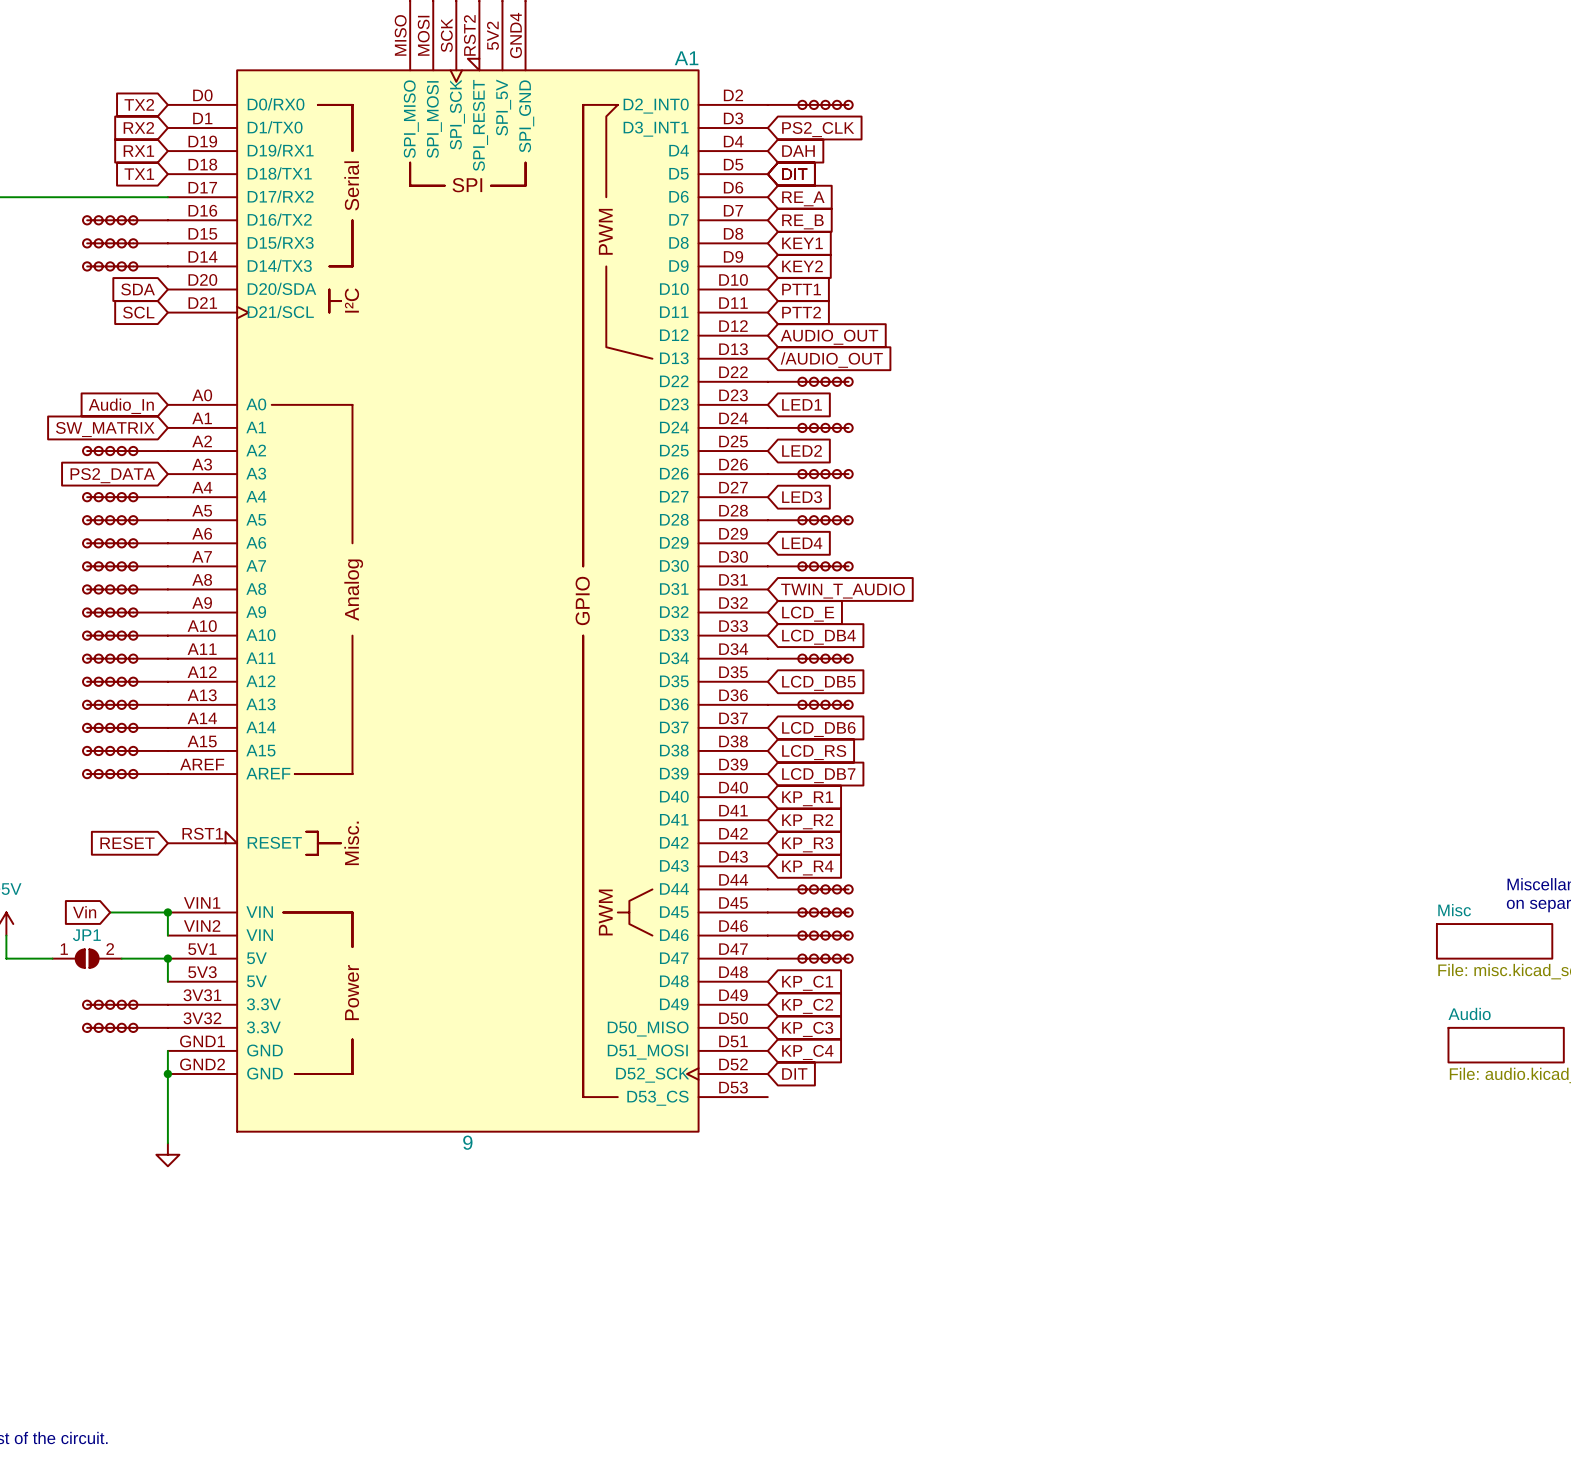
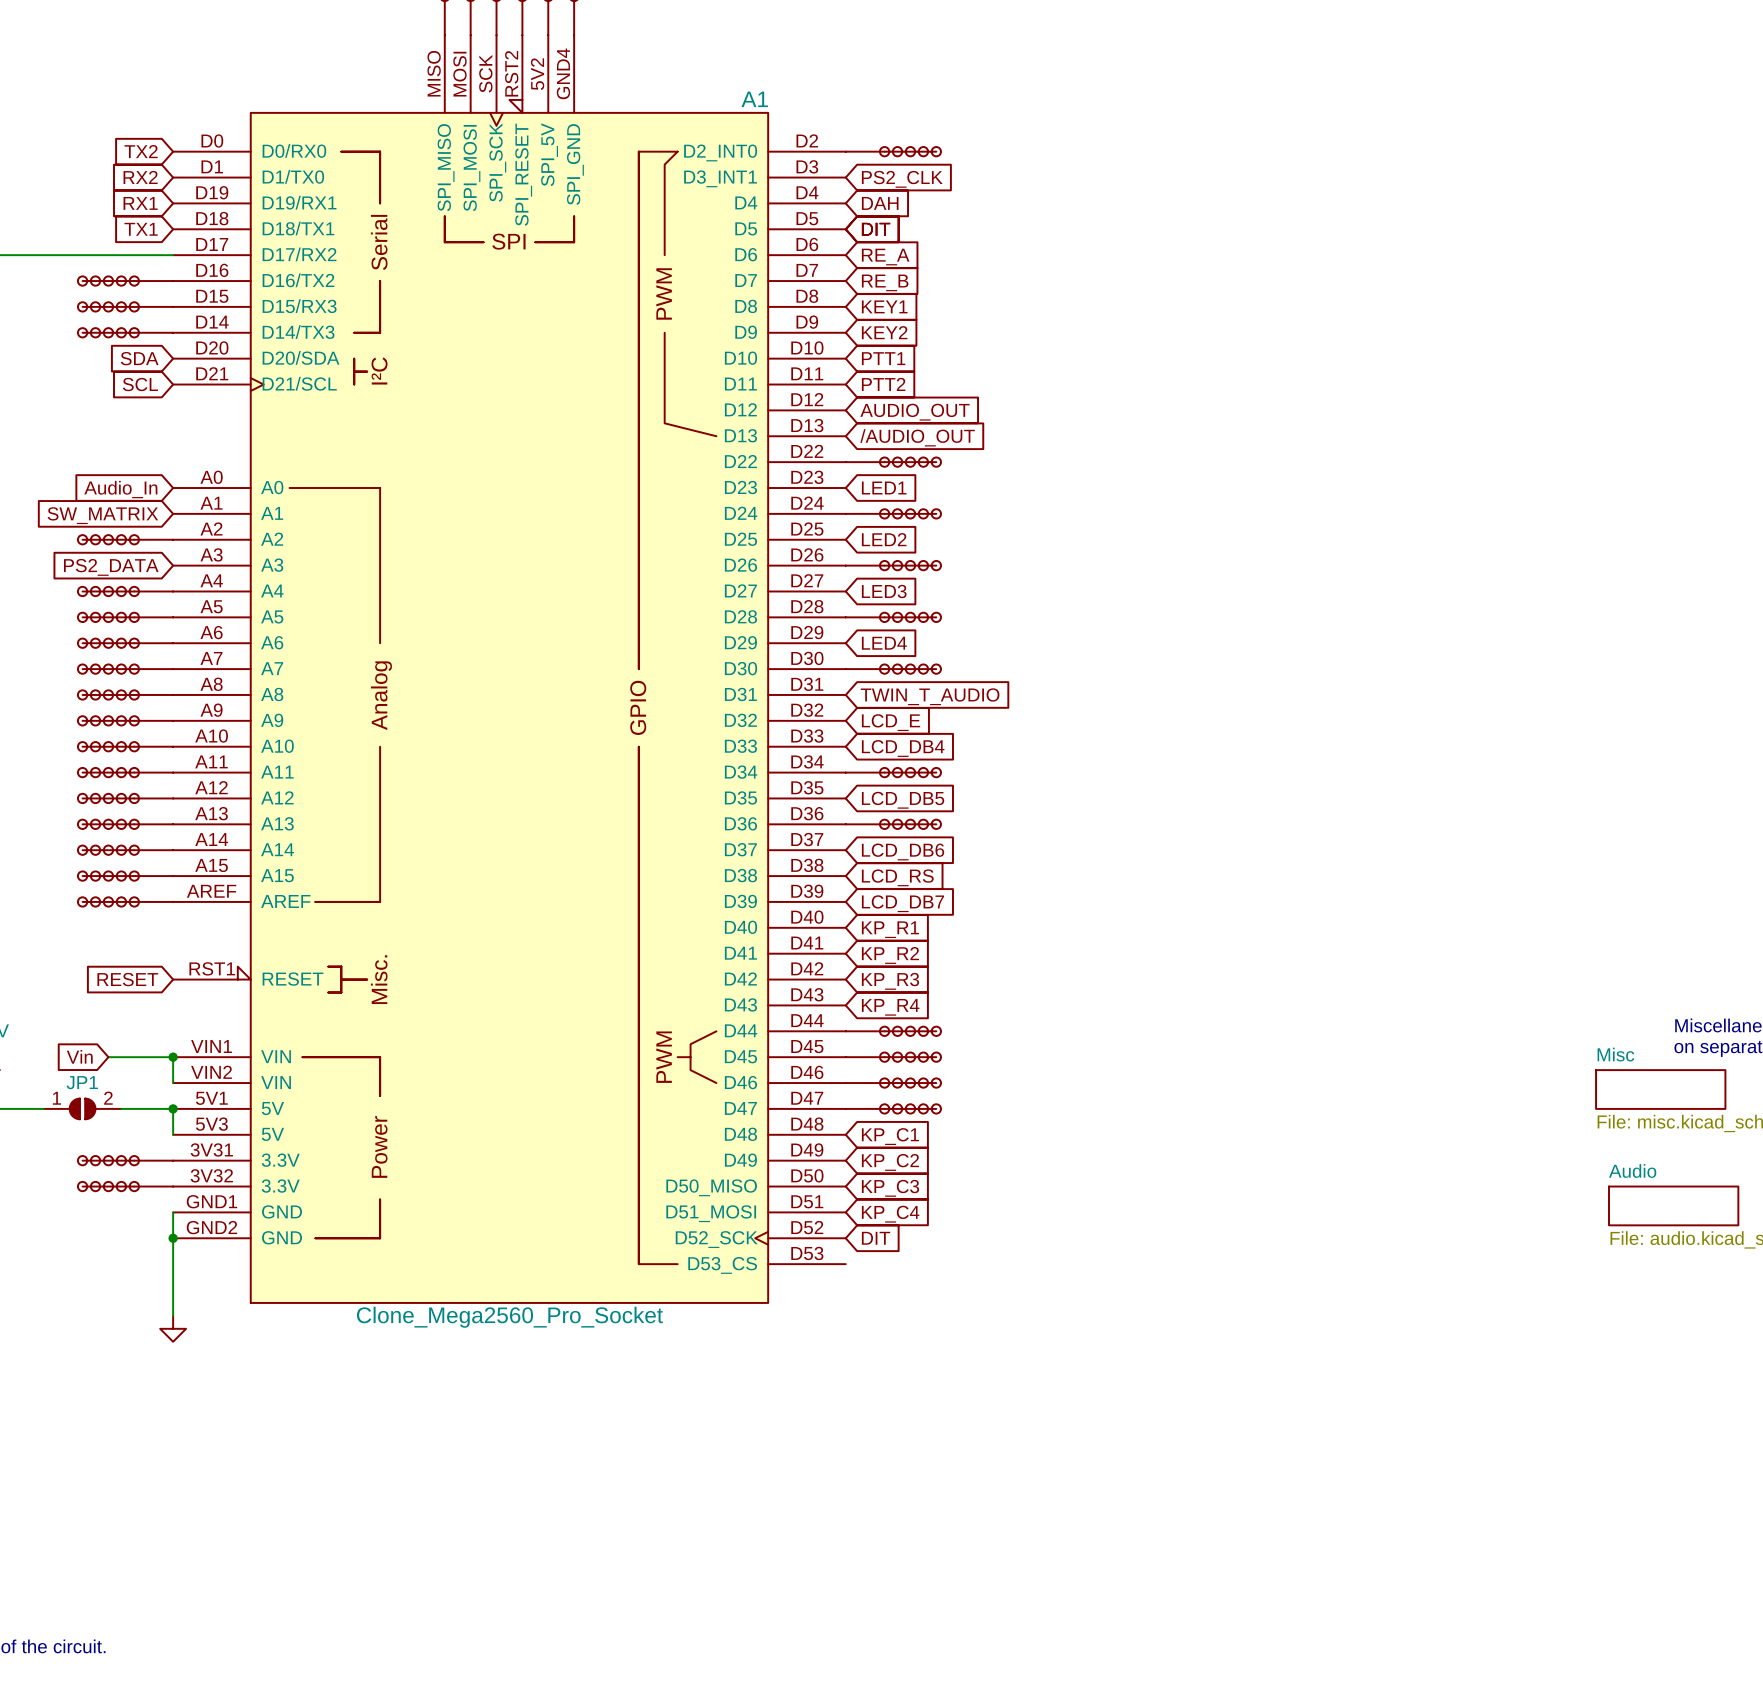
A1 value: 9 (467, 1142) -> Clone_Mega2560_Pro_Socket (509, 1317)

